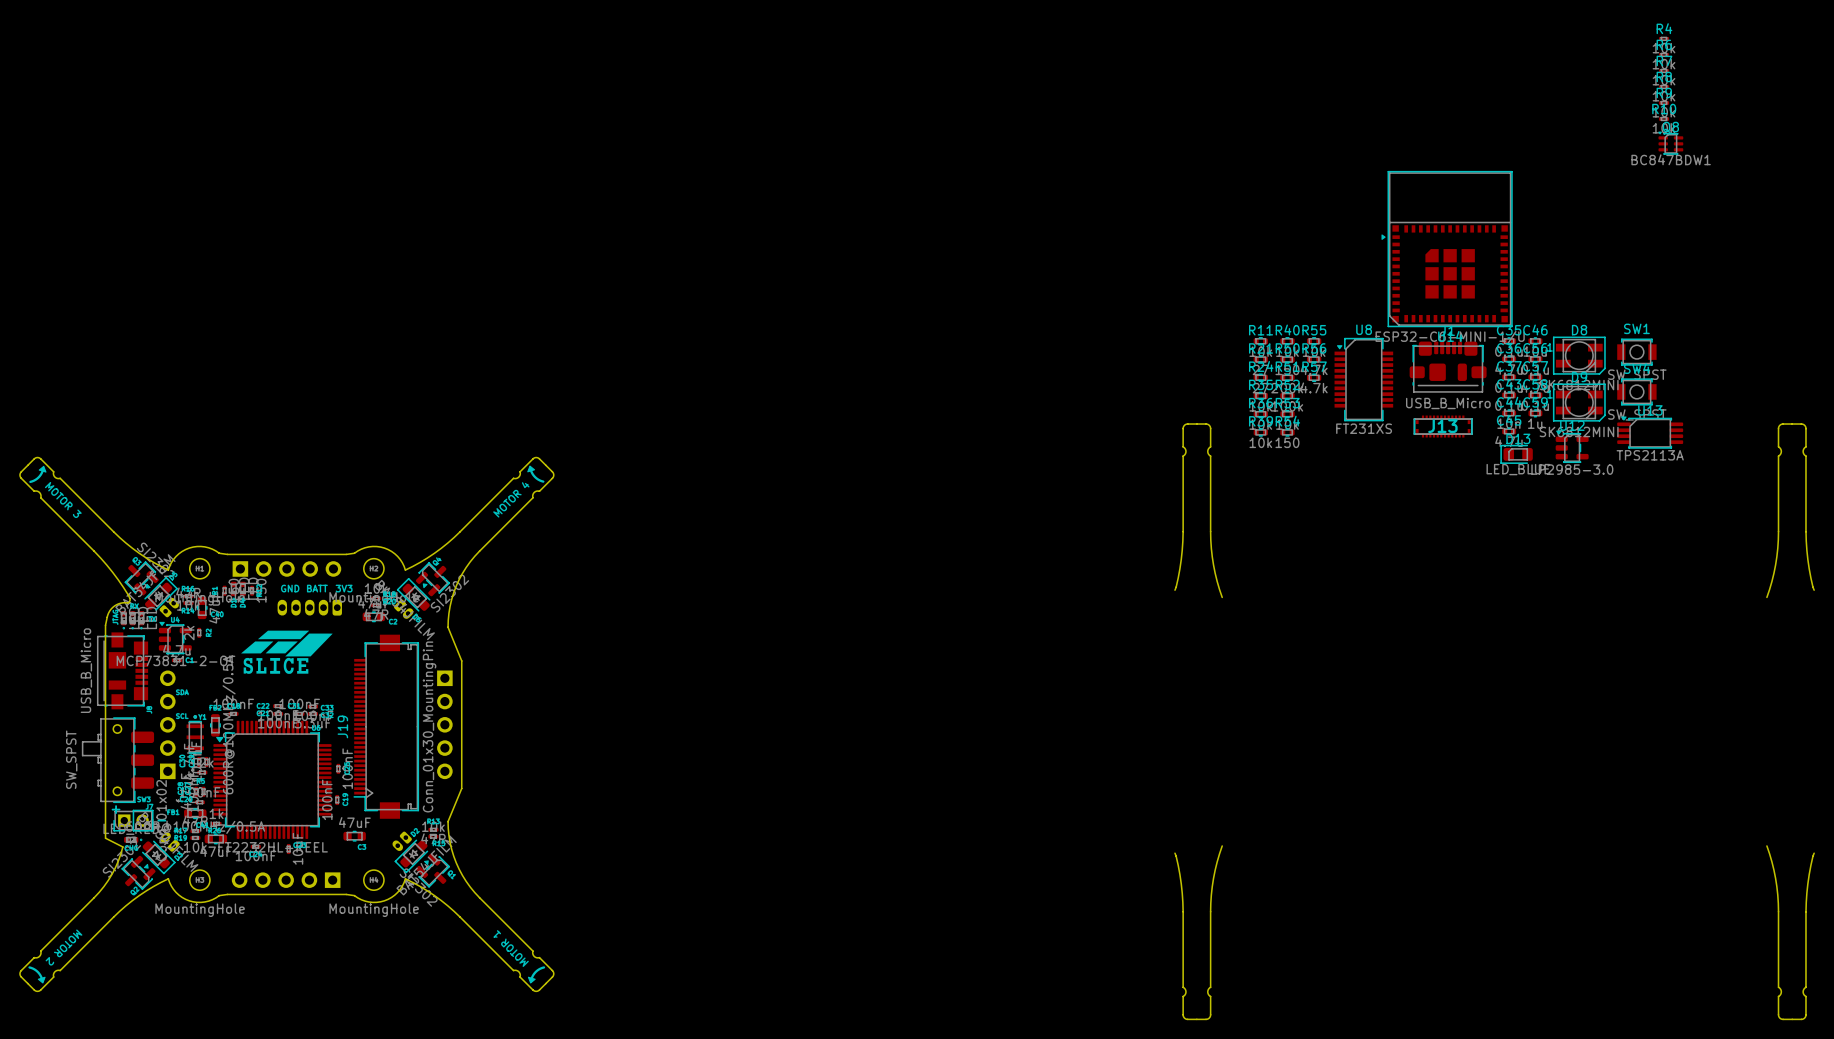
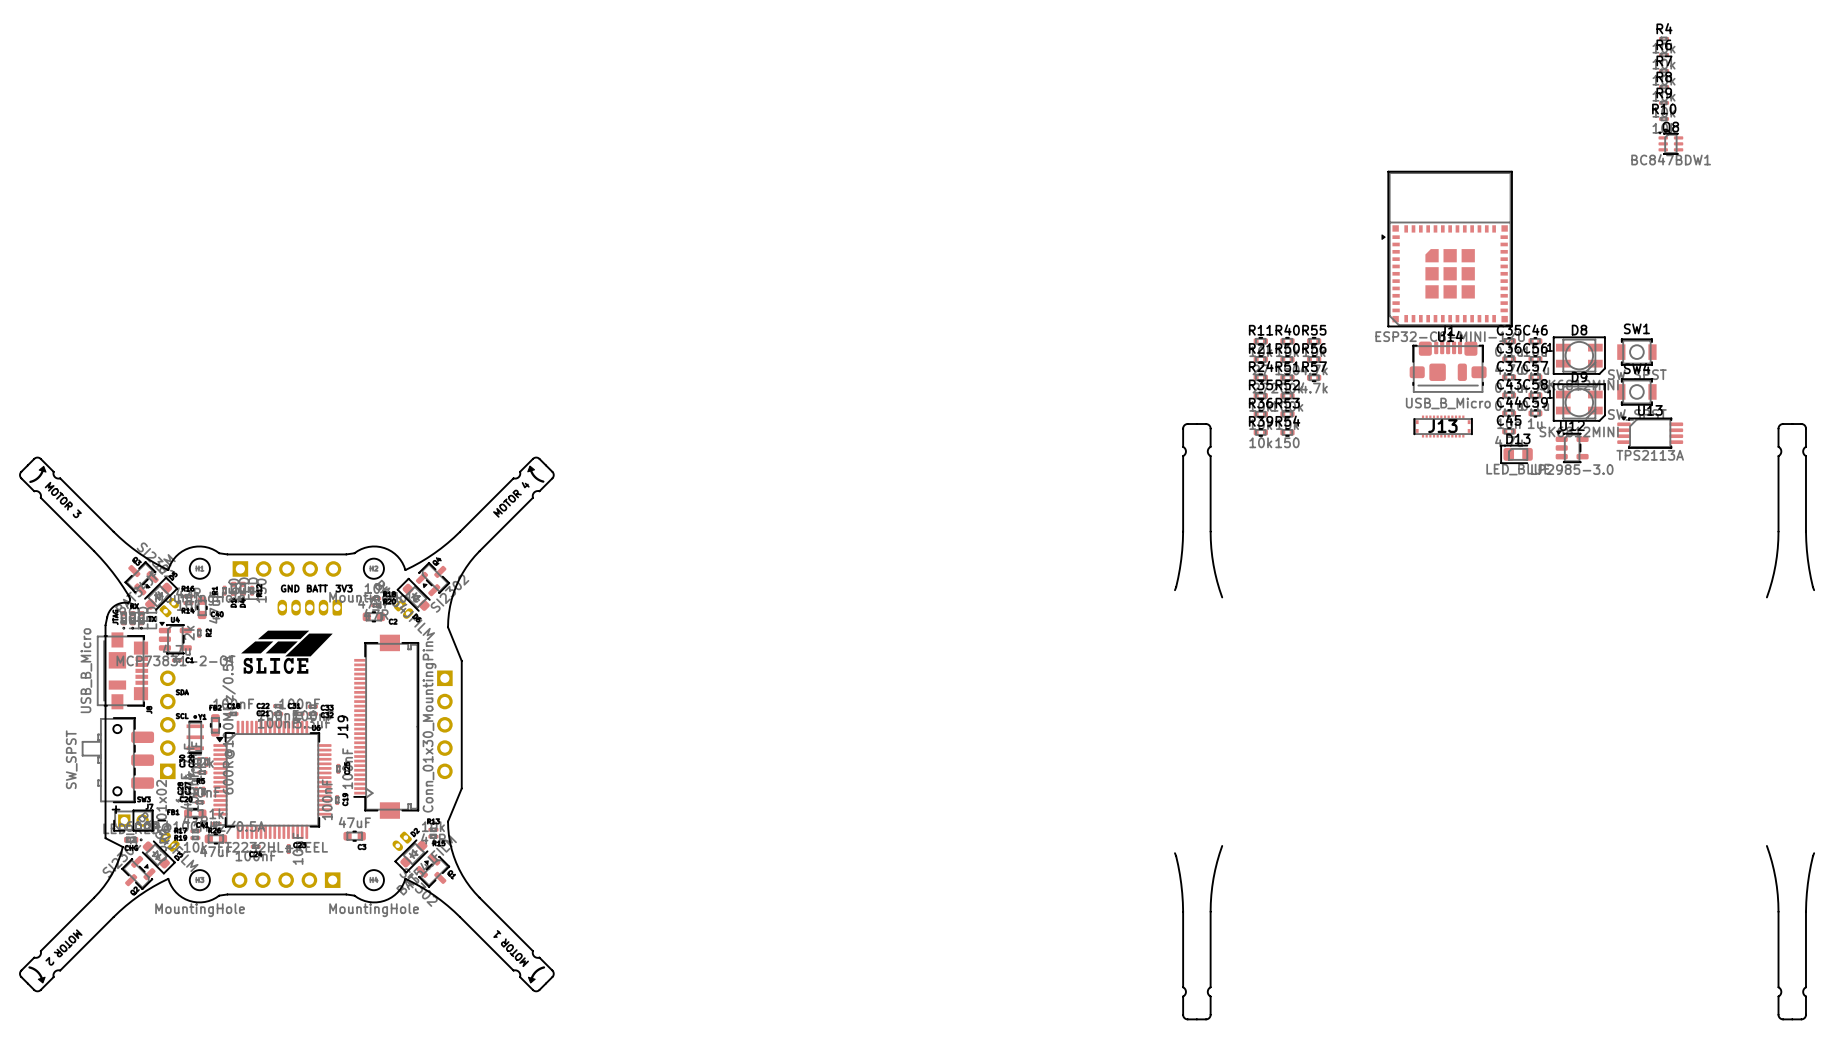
U8: FT231XS (1363, 379) -> none

